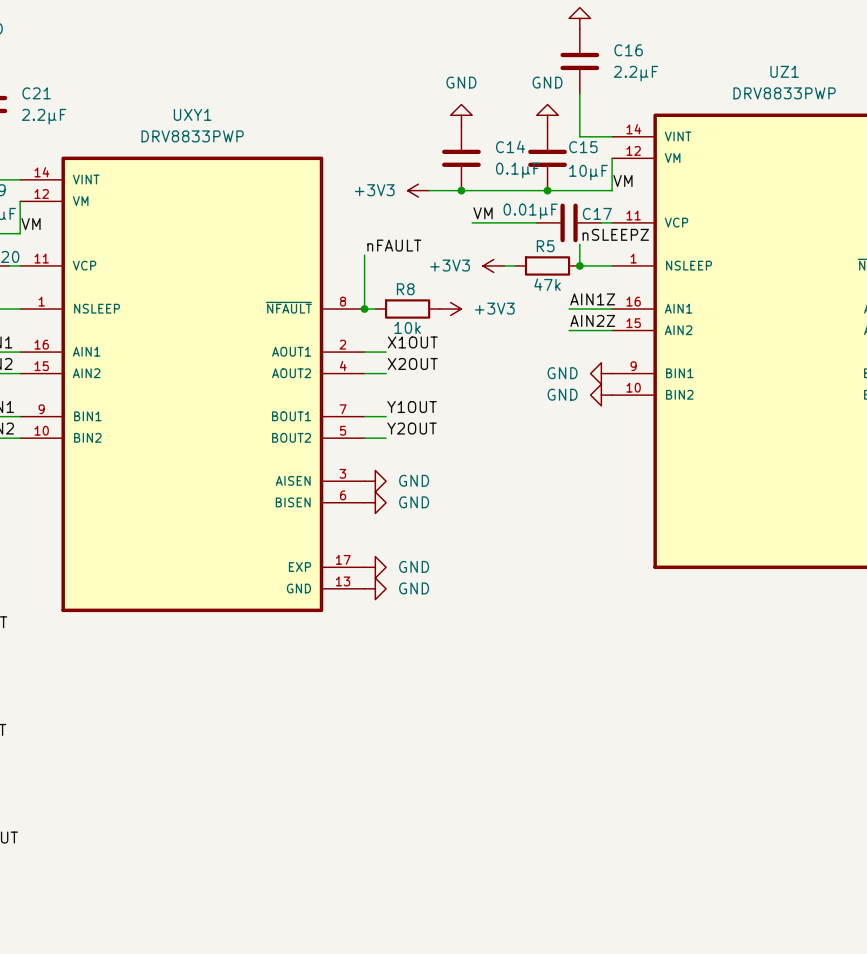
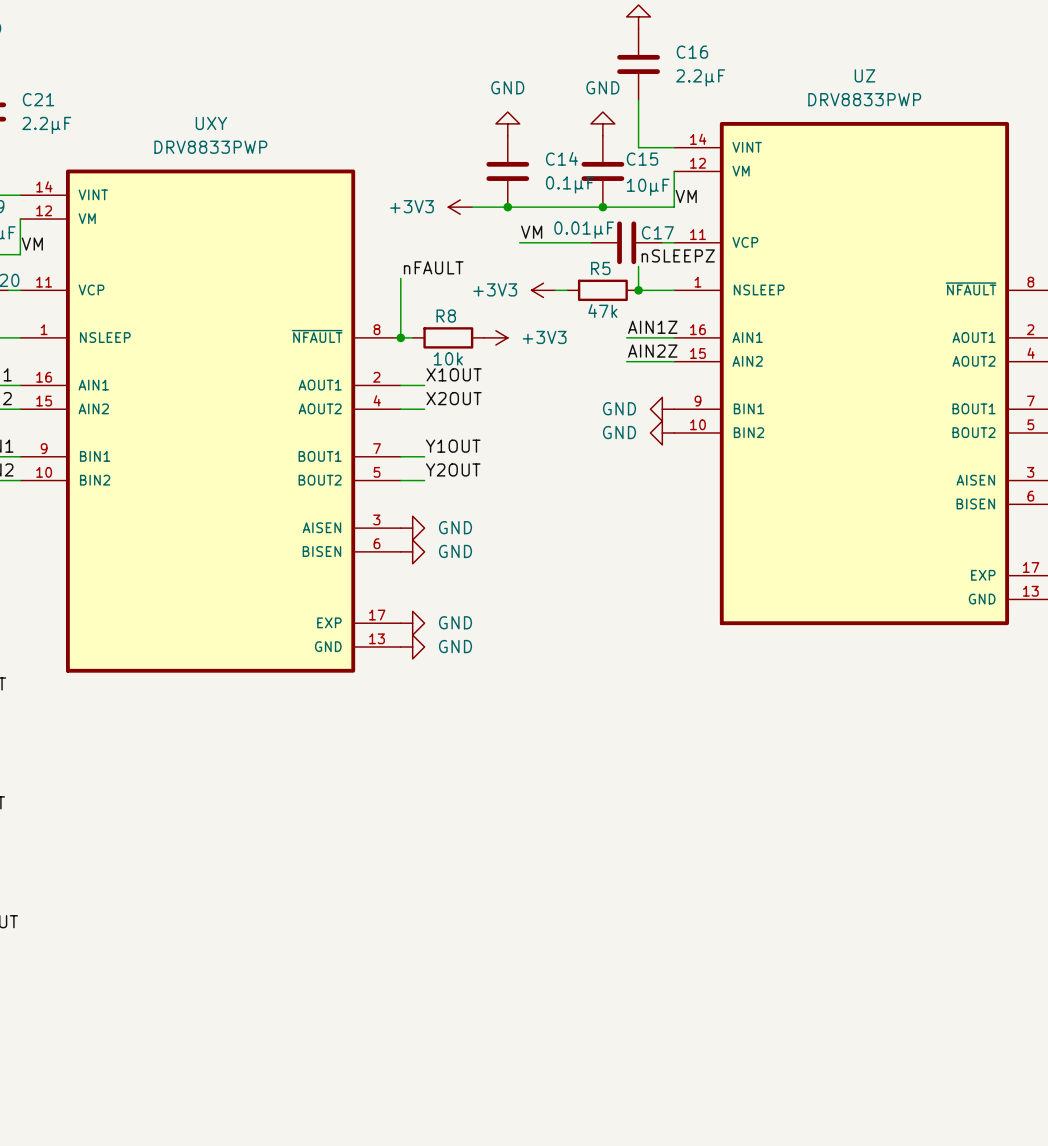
UZ1 name: UZ1 (784, 71) -> UZ (865, 75)
UXY1 name: UXY1 (192, 114) -> UXY (211, 123)

